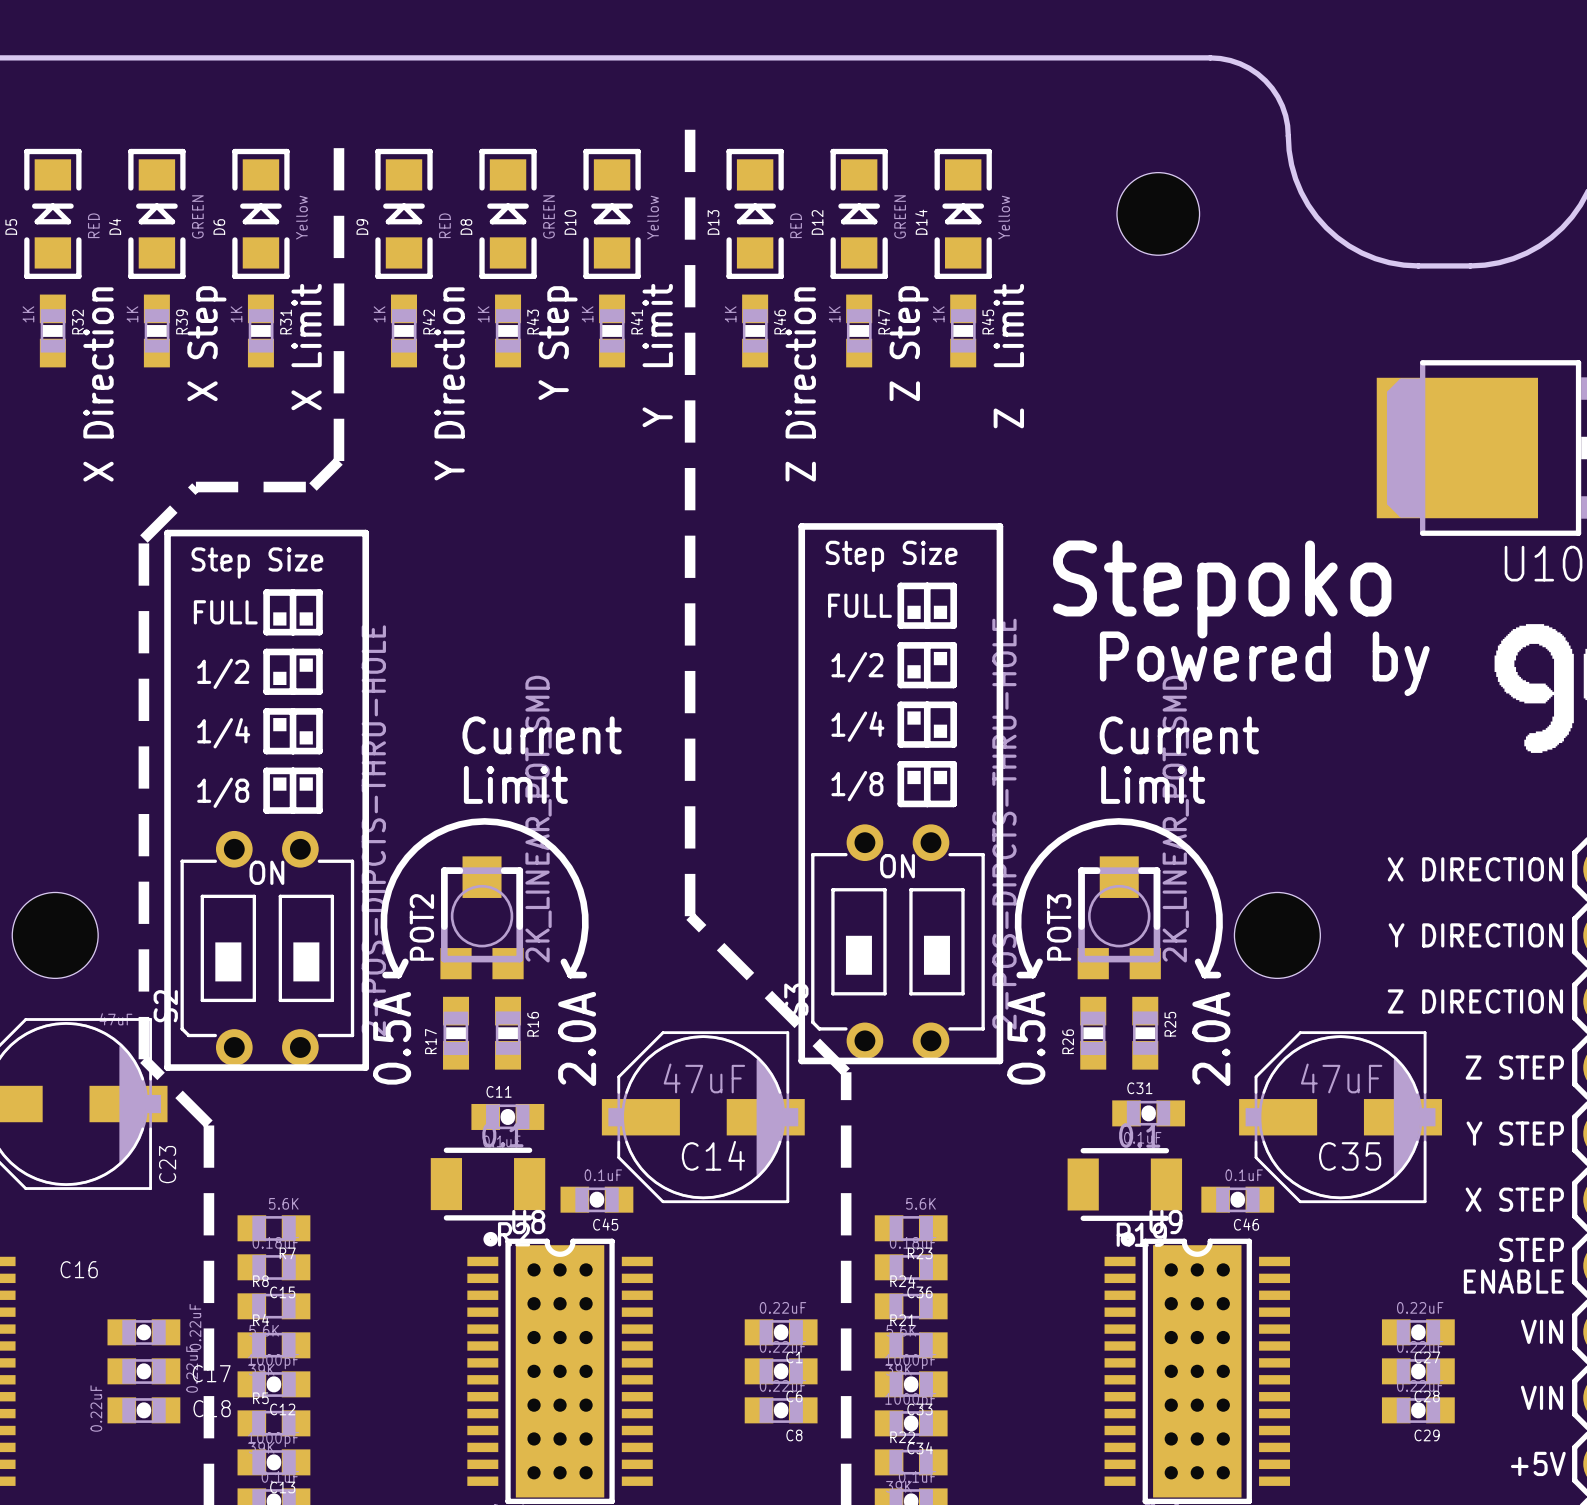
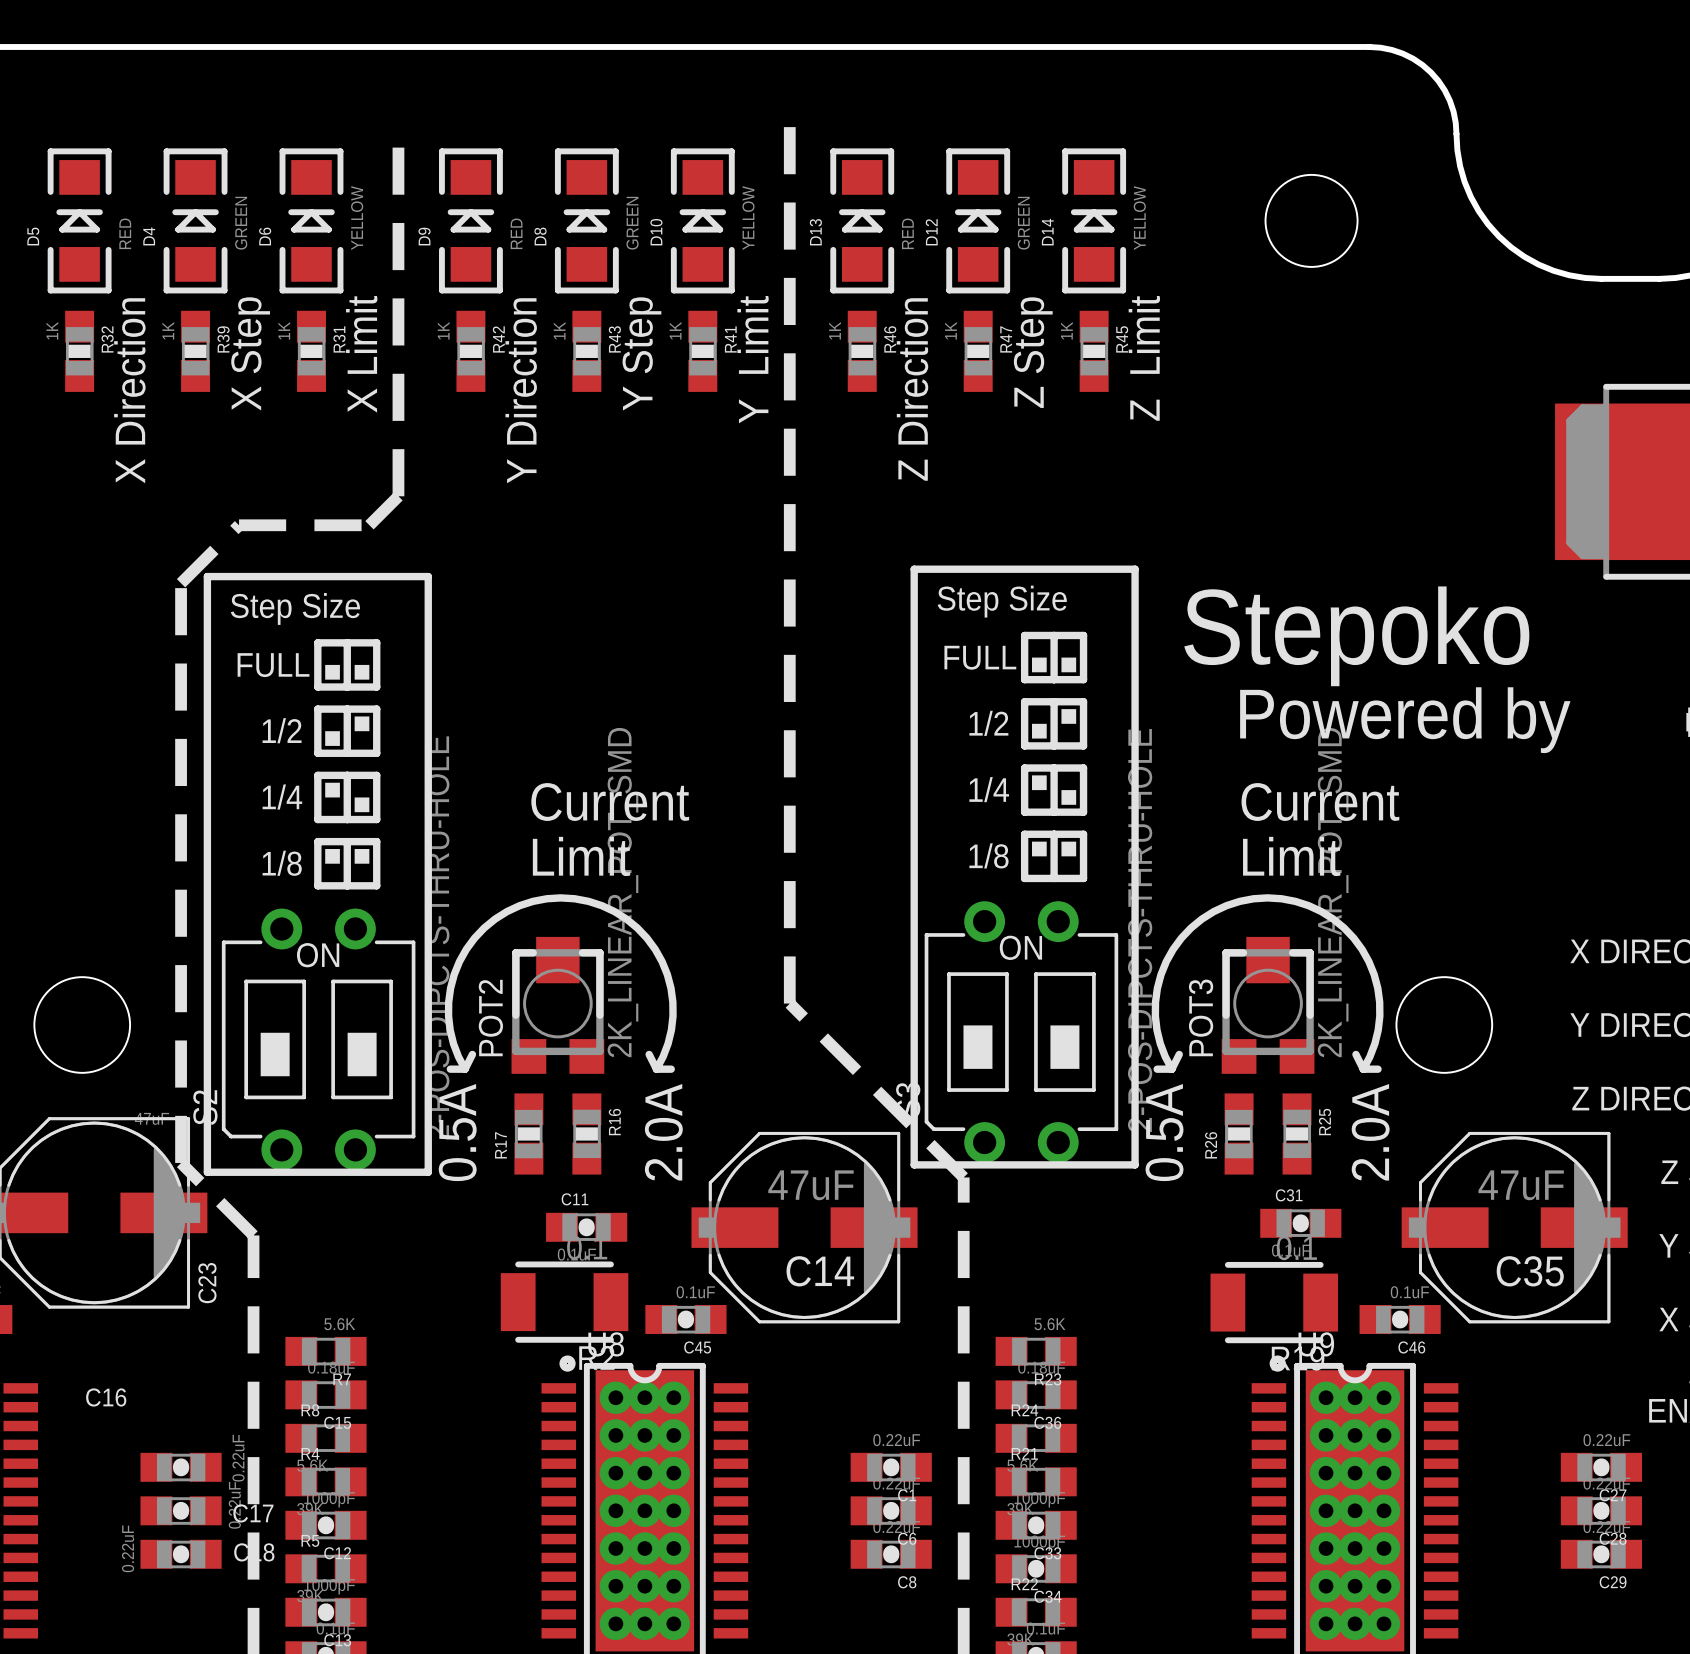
D6 value: Yellow (301, 217) -> YELLOW (357, 218)
D10 value: Yellow (653, 217) -> YELLOW (748, 218)
D14 value: Yellow (1004, 217) -> YELLOW (1139, 218)

